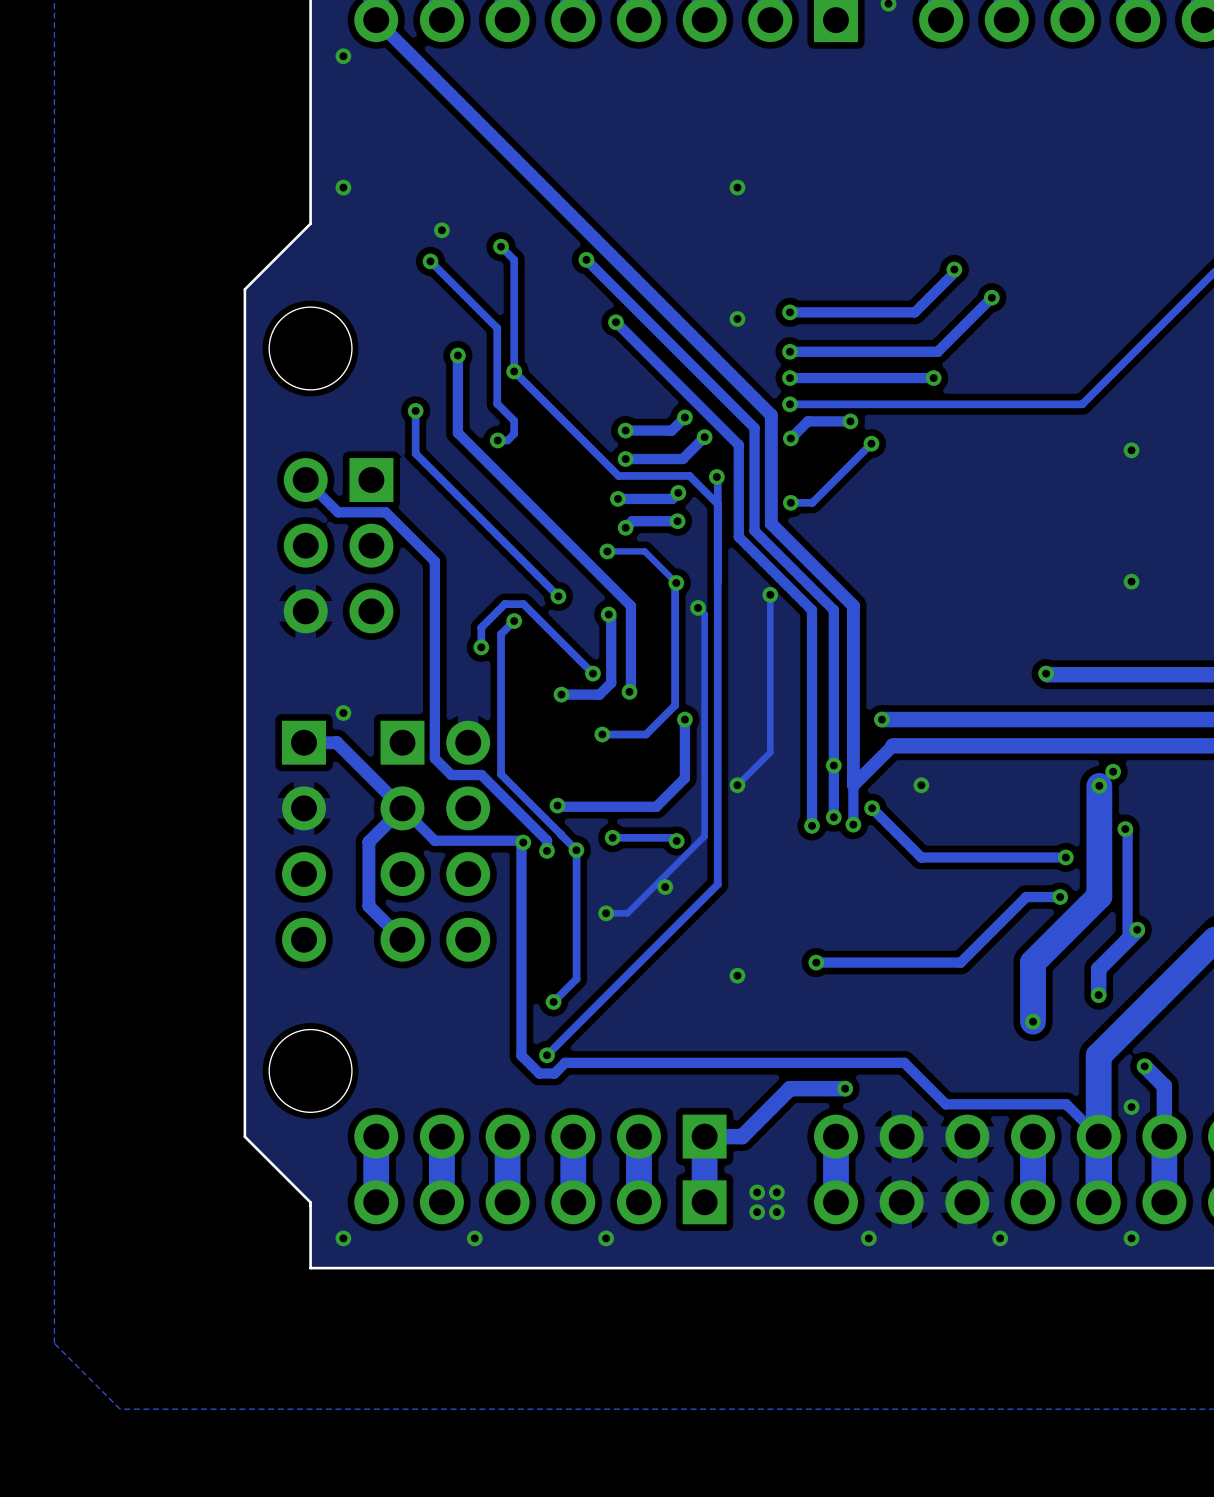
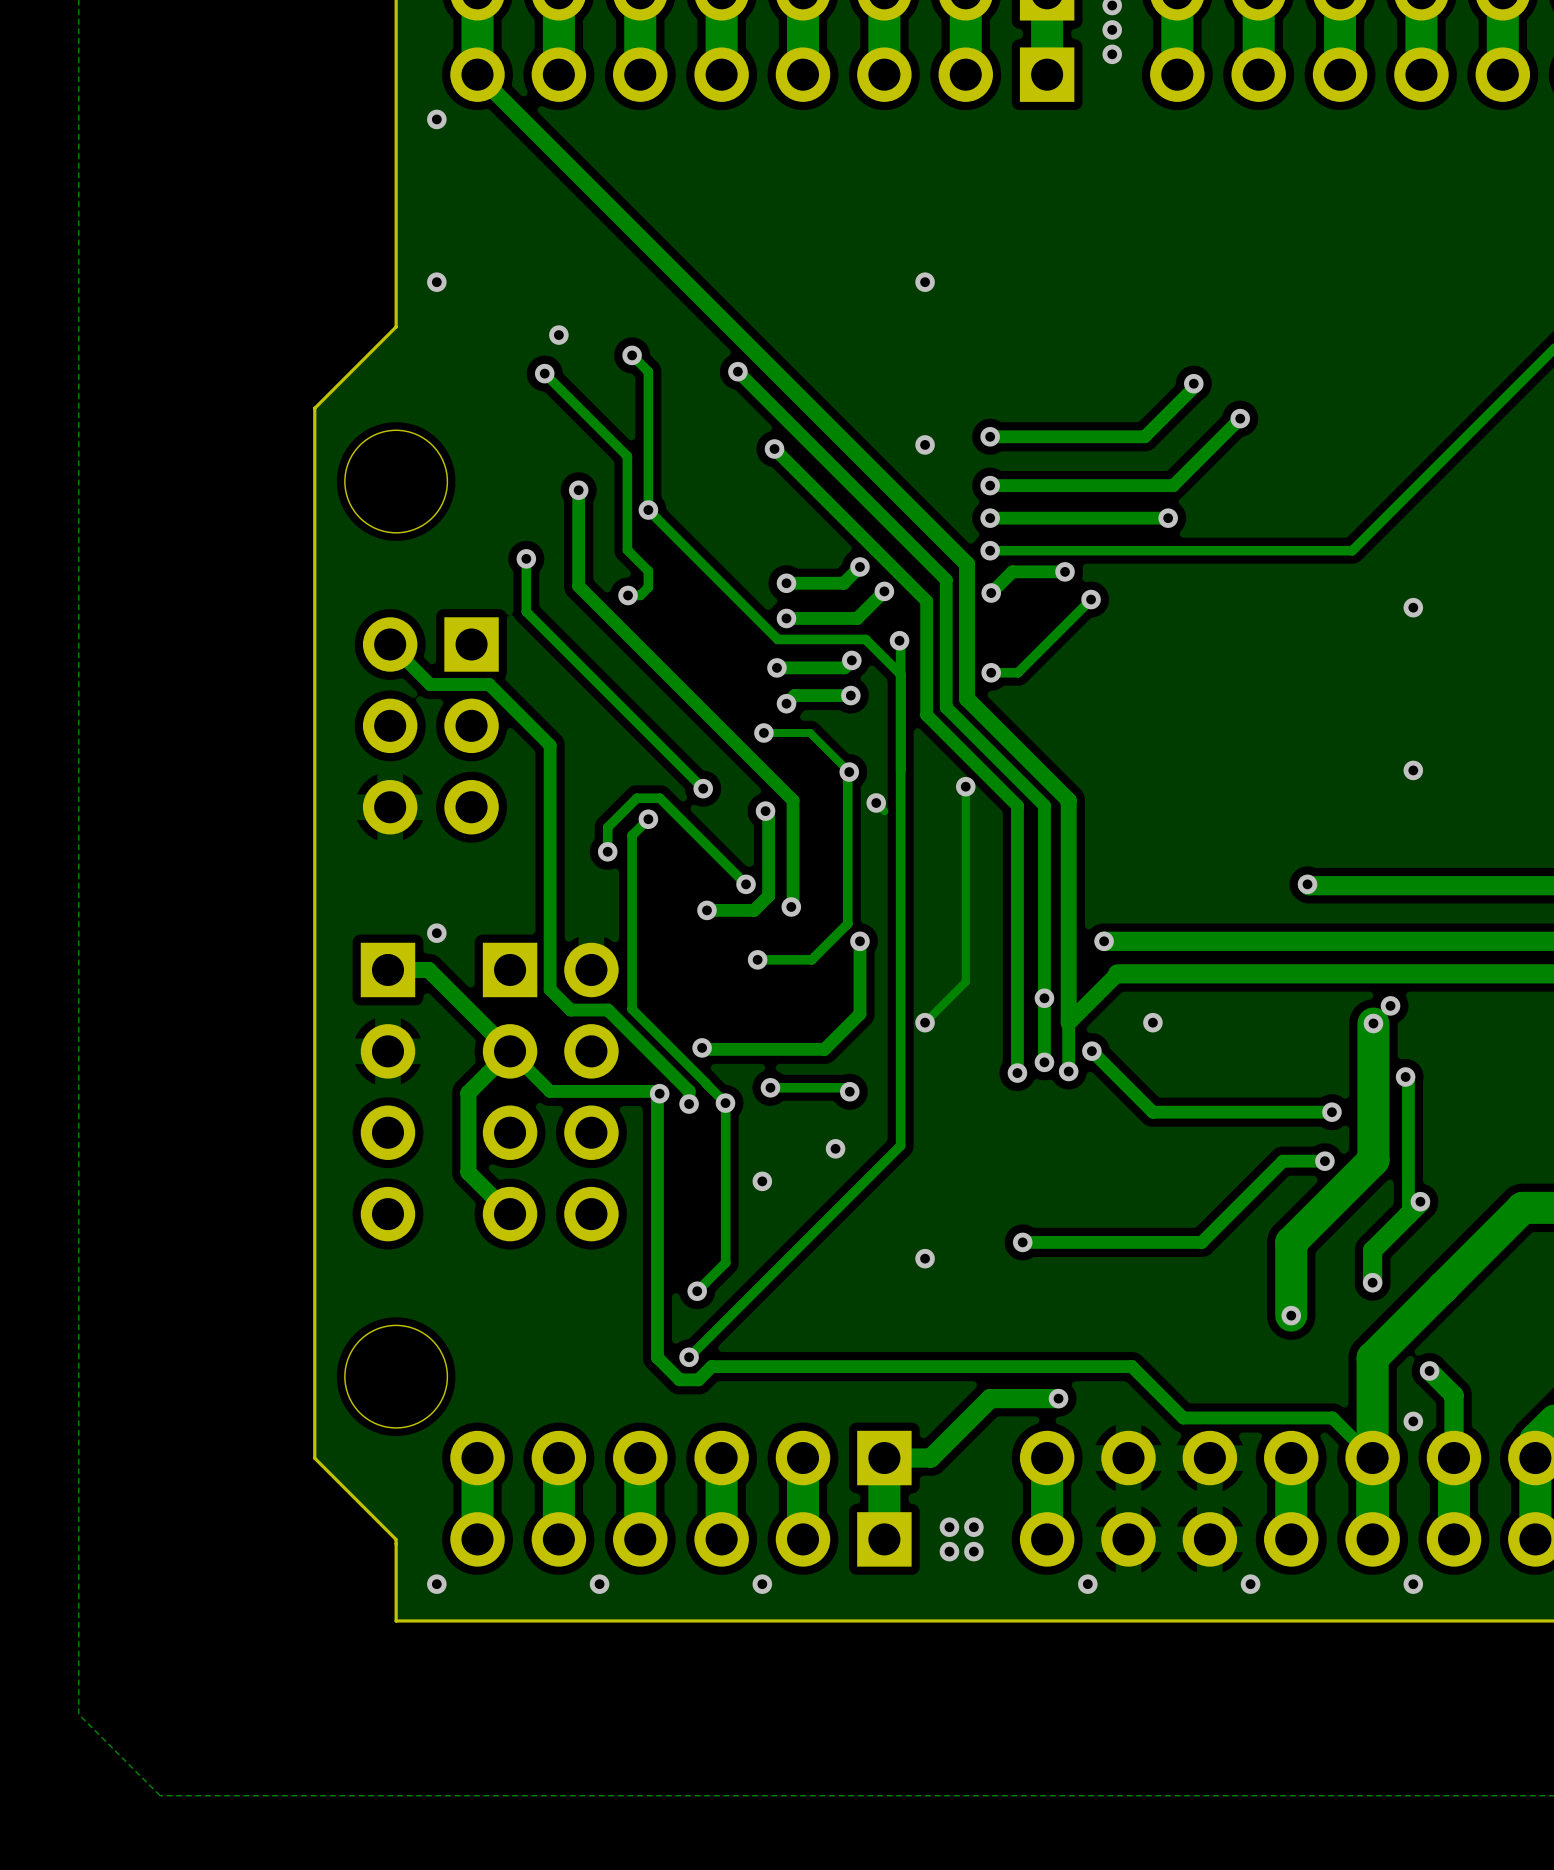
track: (704, 614) (704, 836) (627, 913) (606, 913) -> none

